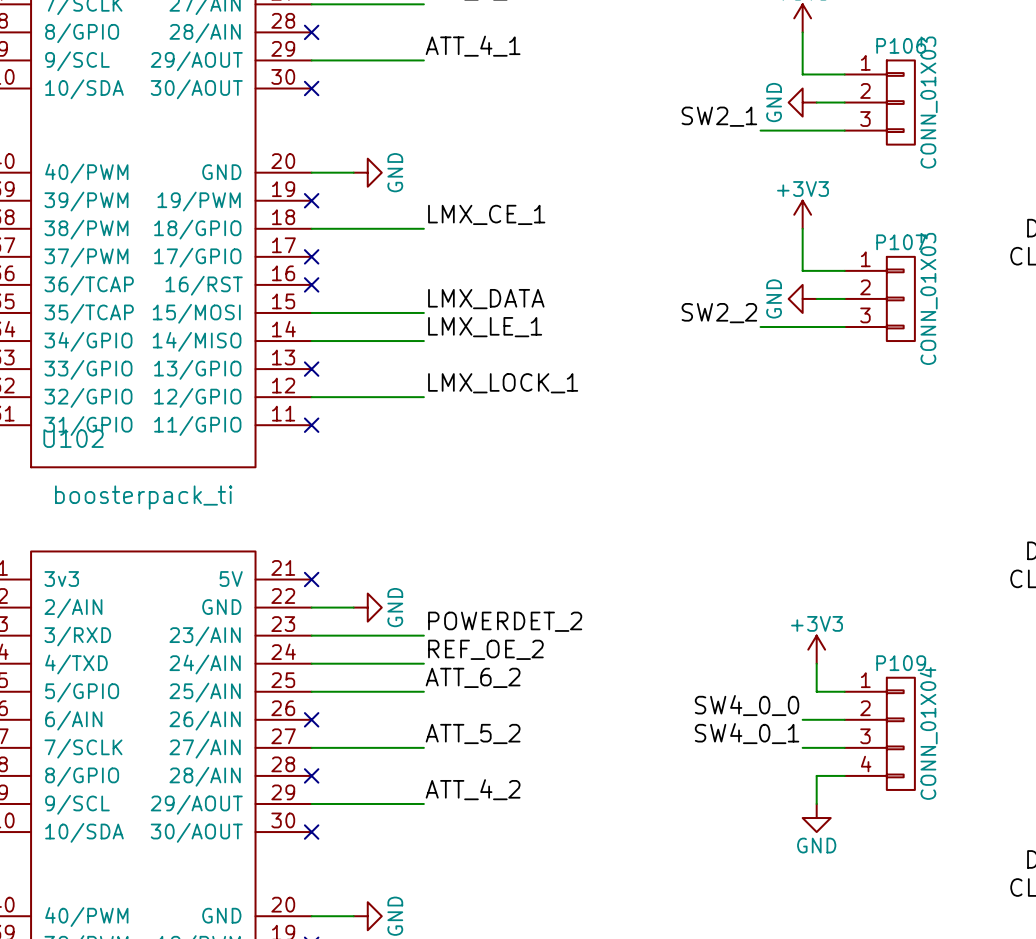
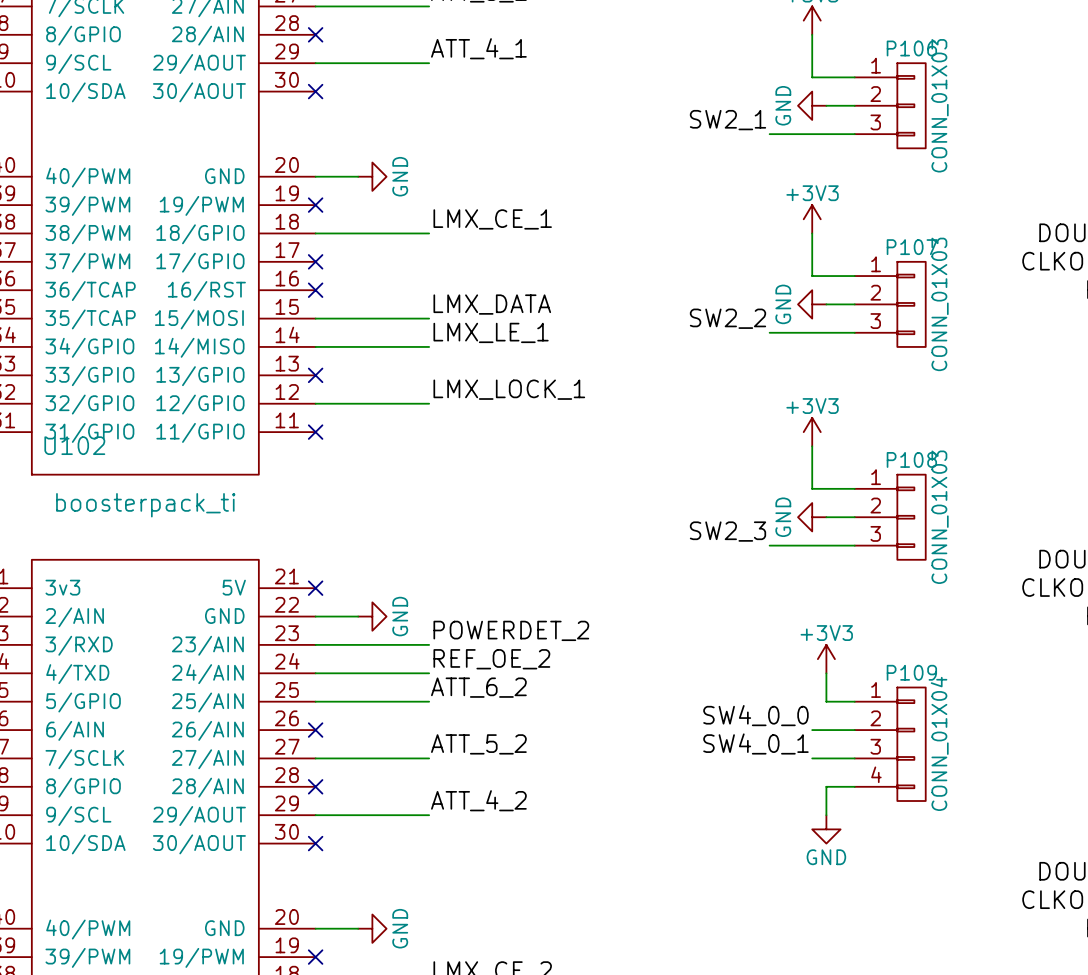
power symbol: none -> +3V3 (812, 432)
wire: none -> (812, 446) (812, 488) (854, 488)
power symbol: none -> GND (812, 517)
wire: none -> (826, 517) (854, 517)
P108: none -> CONN_01X03 (890, 517)
label: none -> SW2_3 (727, 531)
wire: none -> (769, 545) (854, 545)

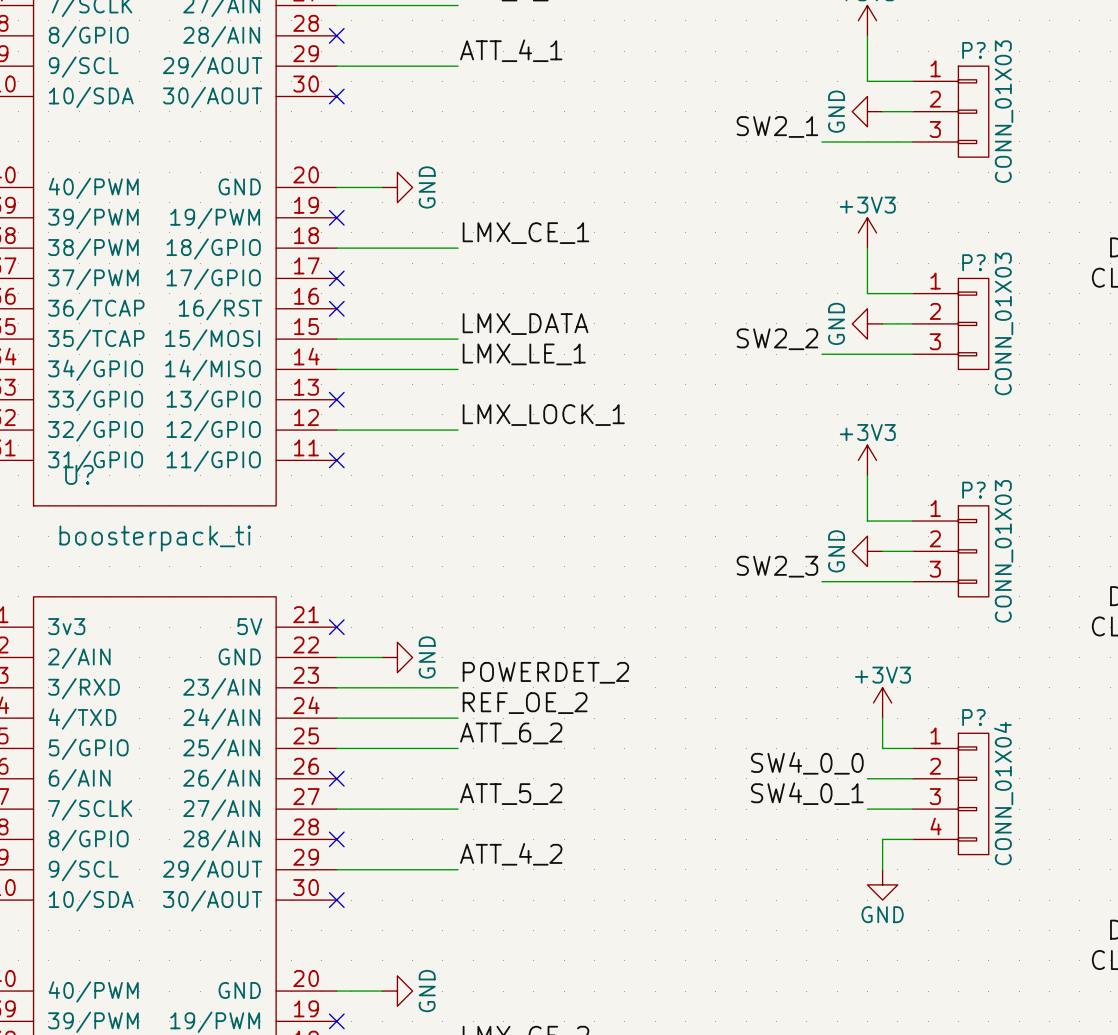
P106 name: P106 (911, 48) -> P? (973, 50)
P107 name: P107 (912, 247) -> P? (973, 262)
U102 name: U102 (74, 445) -> U? (79, 474)
P108 name: P108 (911, 459) -> P? (973, 490)
P109 name: P109 (911, 672) -> P? (973, 717)

